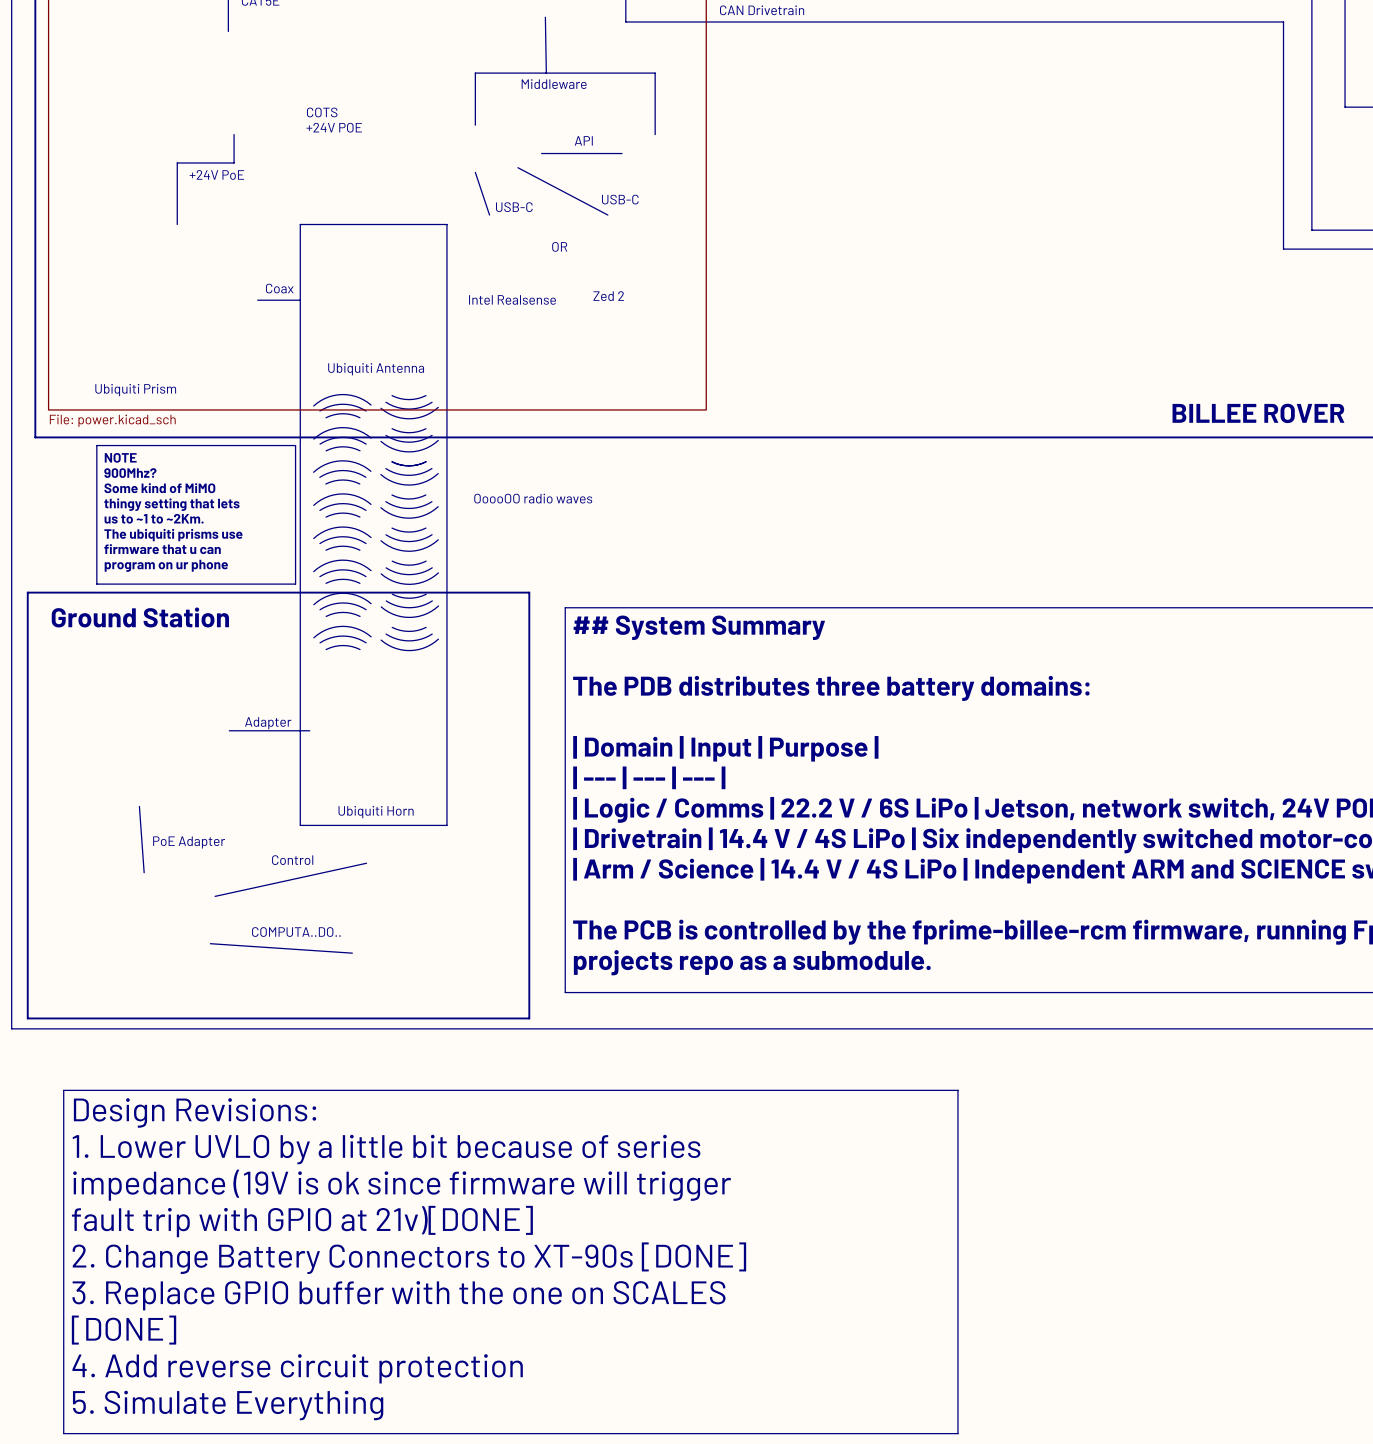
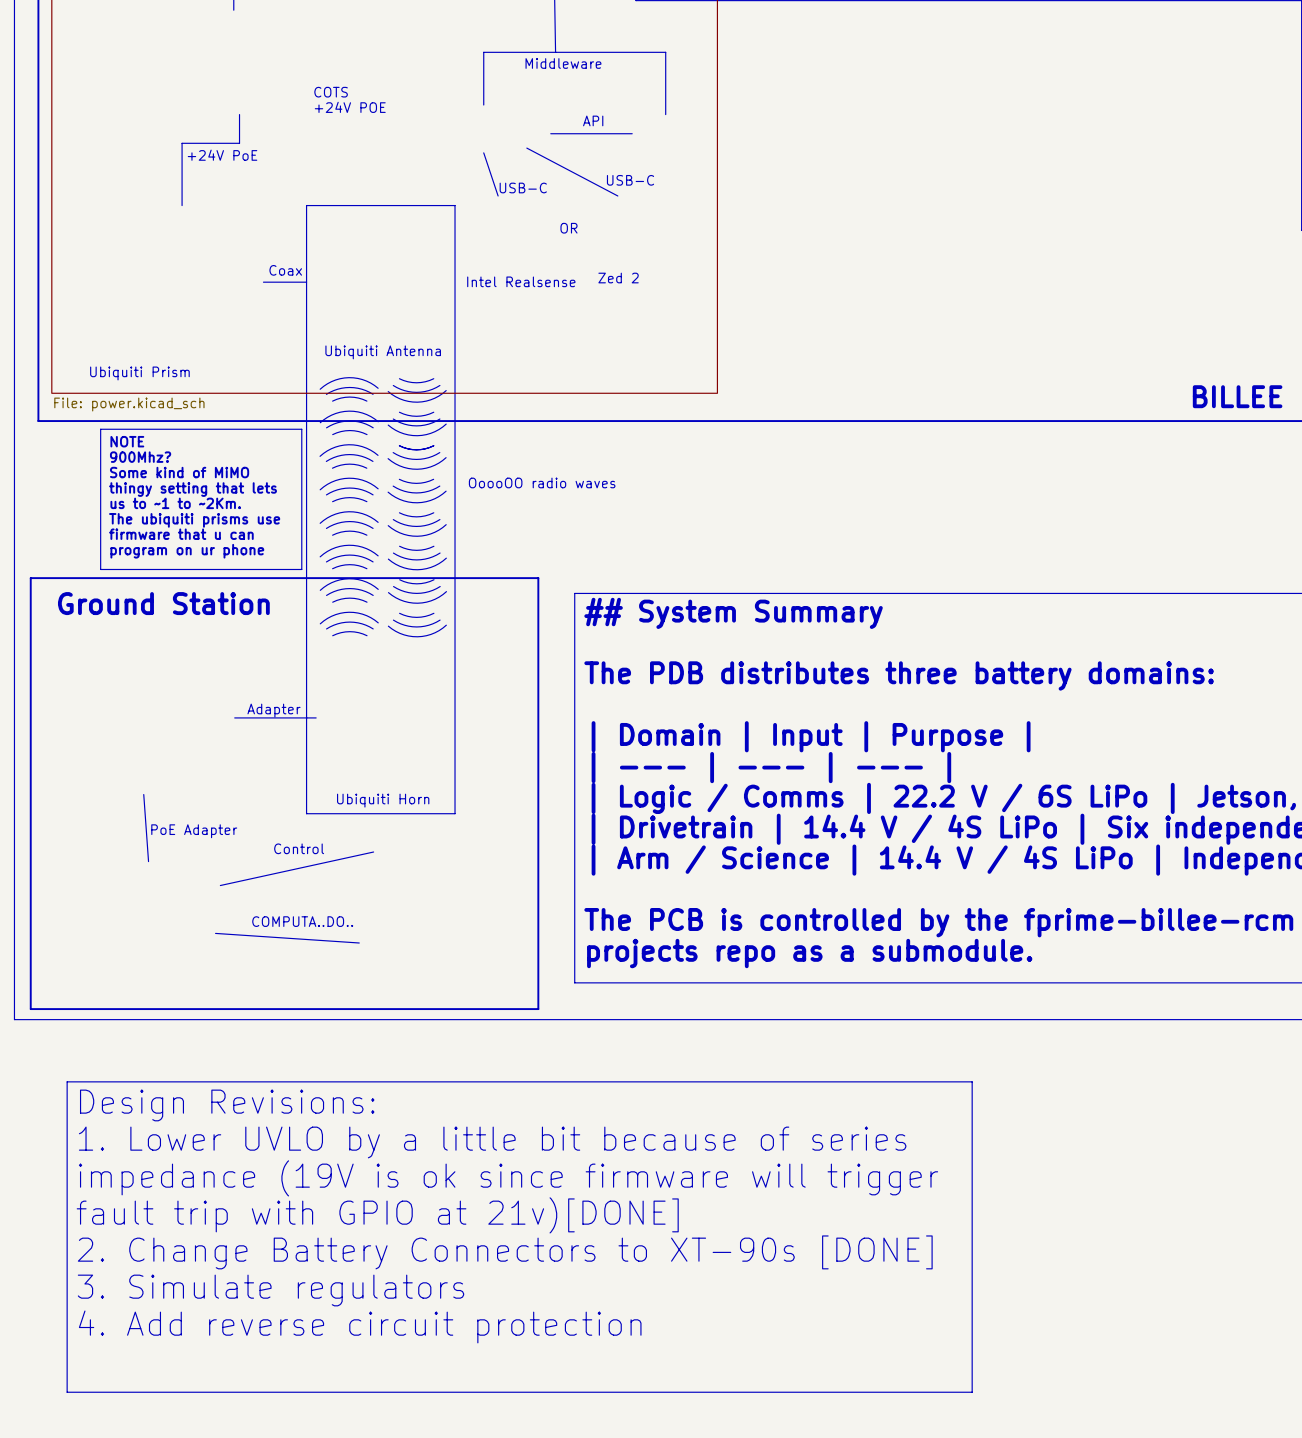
text: 3. Replace GPIO buffer with the one on SCALES (398, 1295) -> 3. Simulate regulators (270, 1290)
text: [DONE] (124, 1330) -> 4. Add reverse circuit protection (360, 1326)
text: 4. Add reverse circuit protection (297, 1368) -> none
line: (63, 1397) (63, 1433) (957, 1433) (957, 1397) -> (67, 1392) (972, 1392)
text: 5. Simulate Everything (228, 1405) -> none

